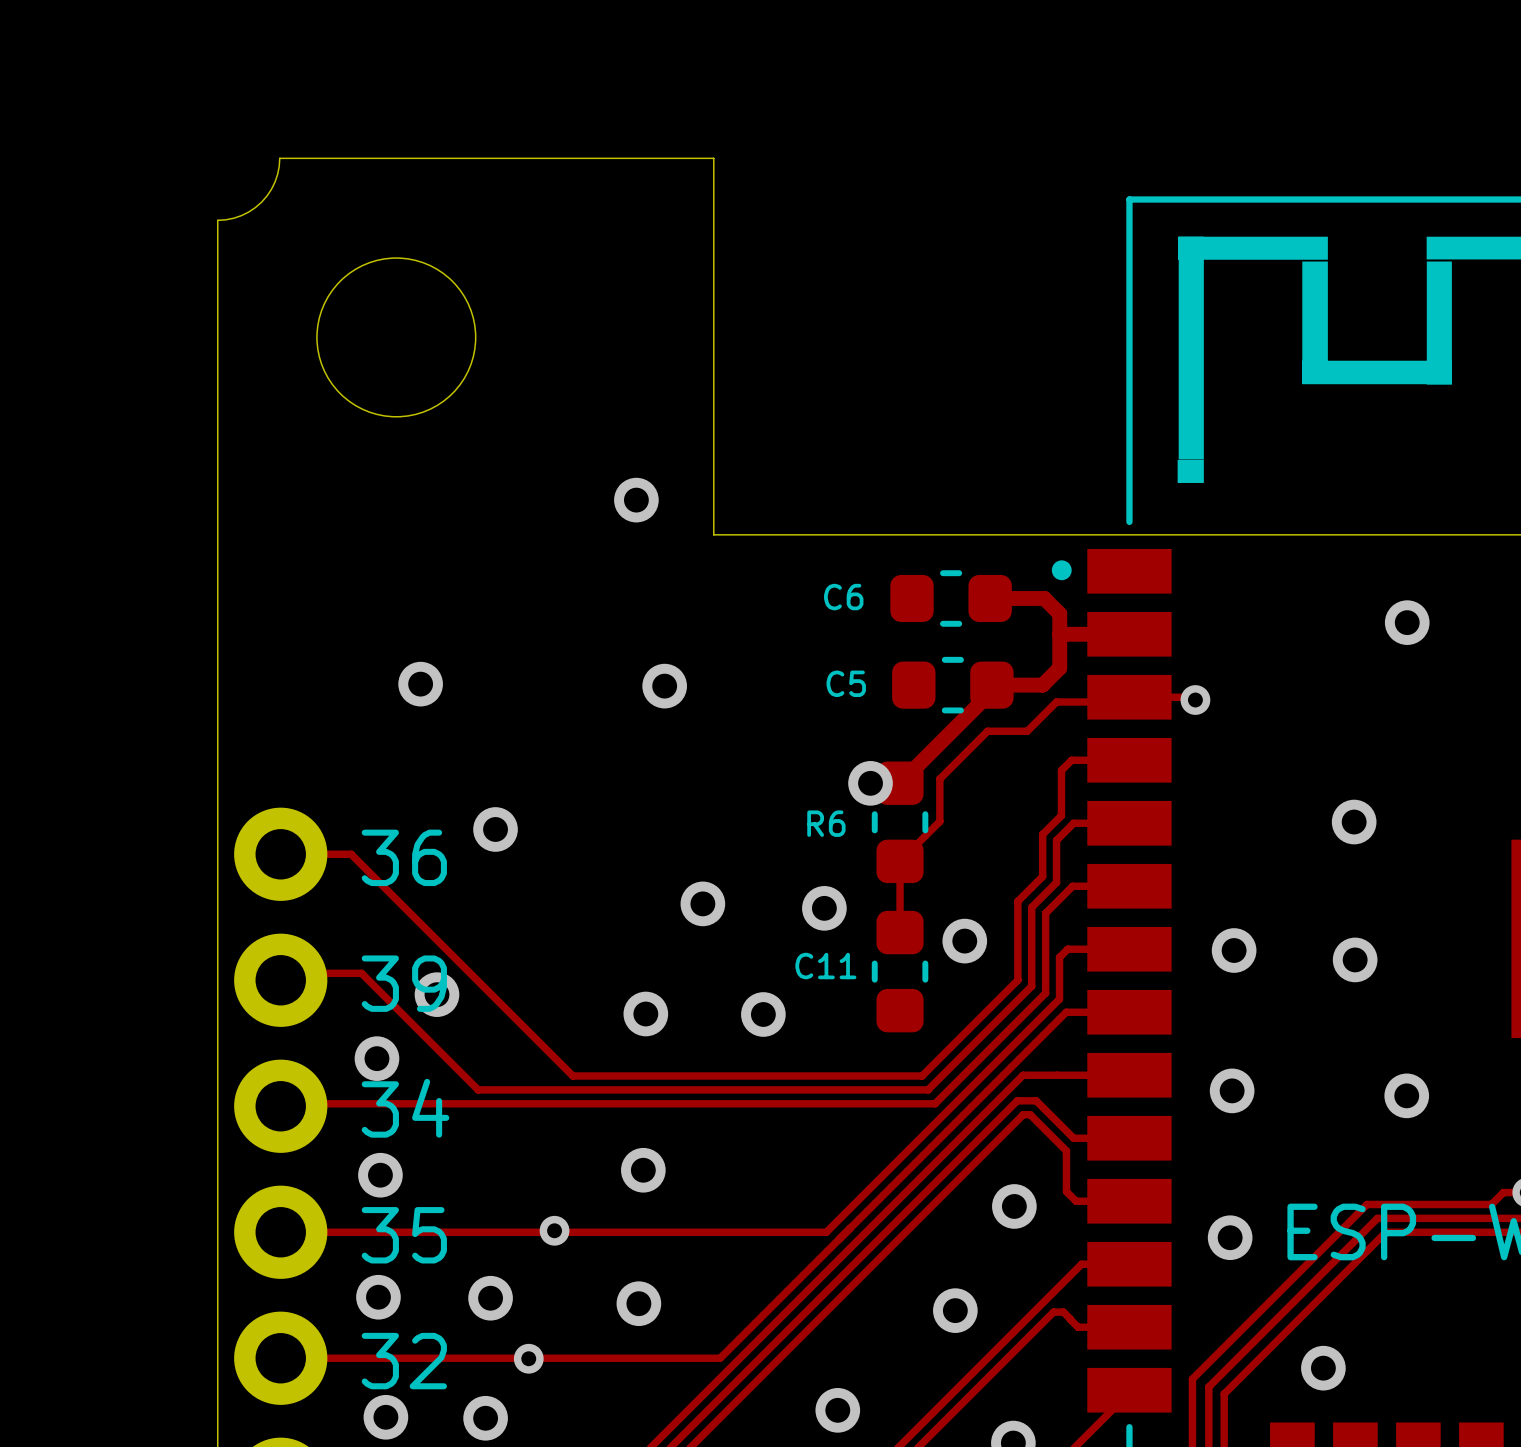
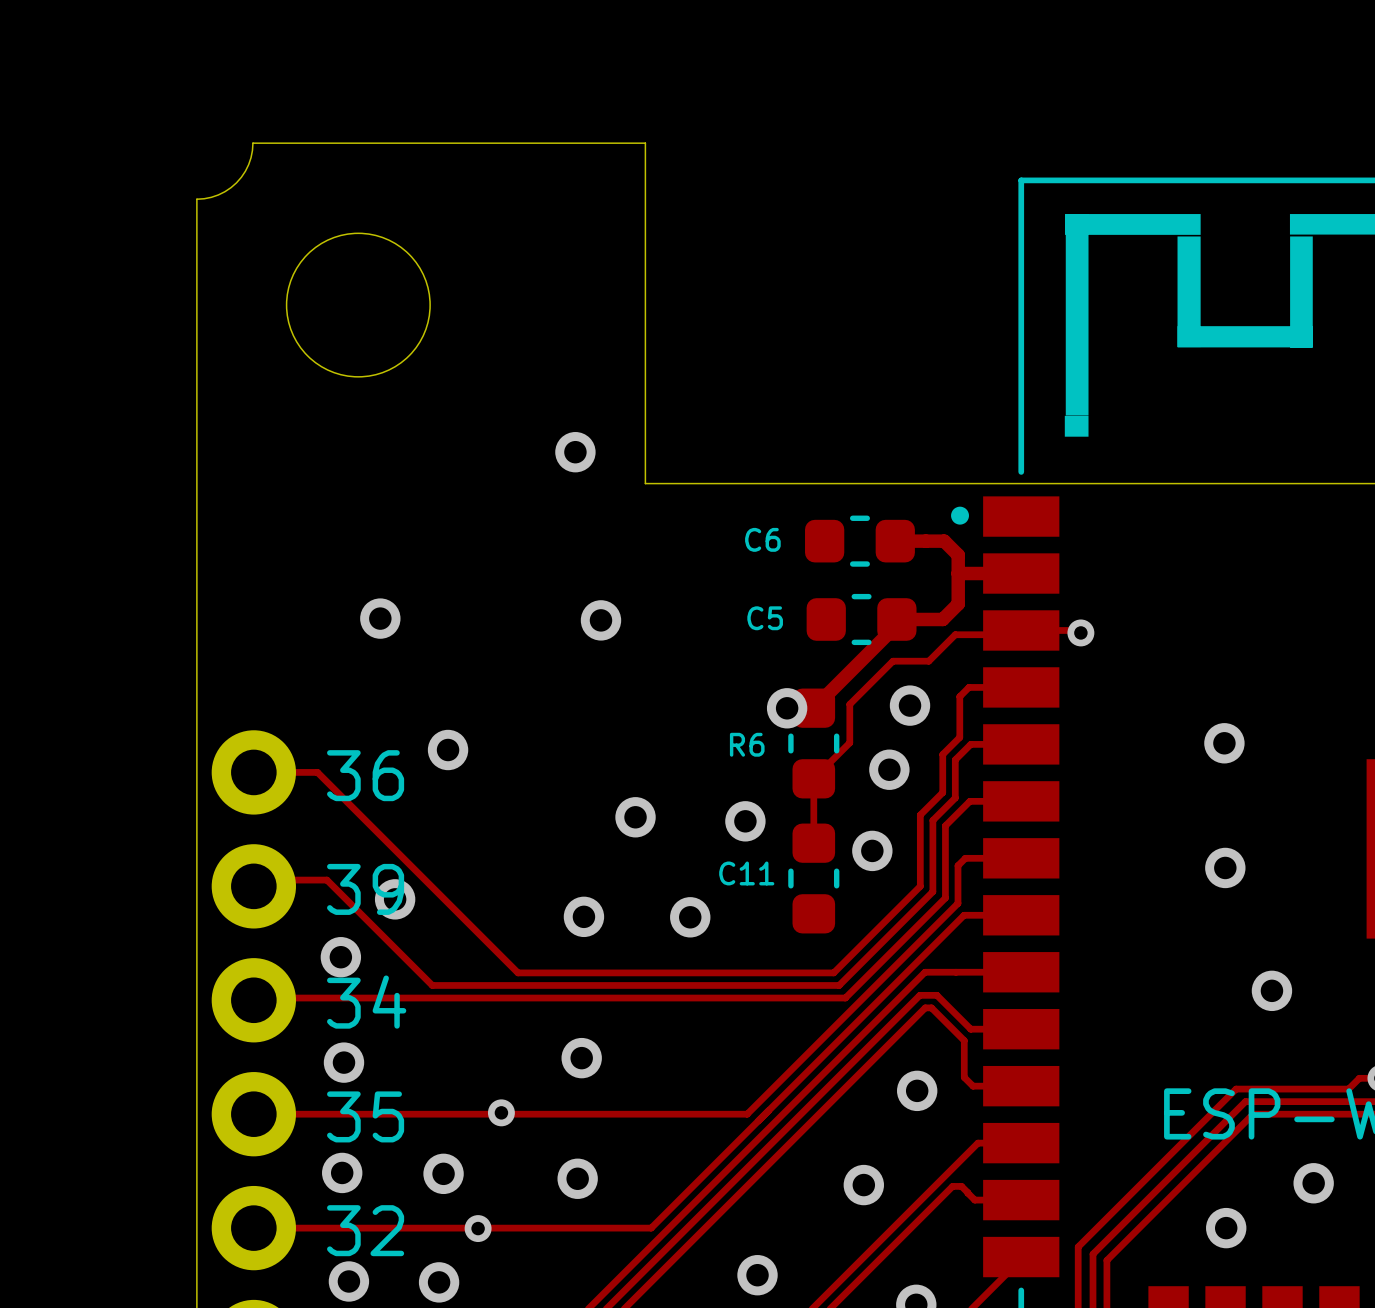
via: (1407, 622) -> none
via: none -> (910, 705)
via: none -> (889, 769)
via: (1234, 950) -> none
via: (1232, 1090) -> none
via: (1230, 1237) -> none
via: none -> (1313, 1183)
via position: (1323, 1368) -> (1226, 1228)

